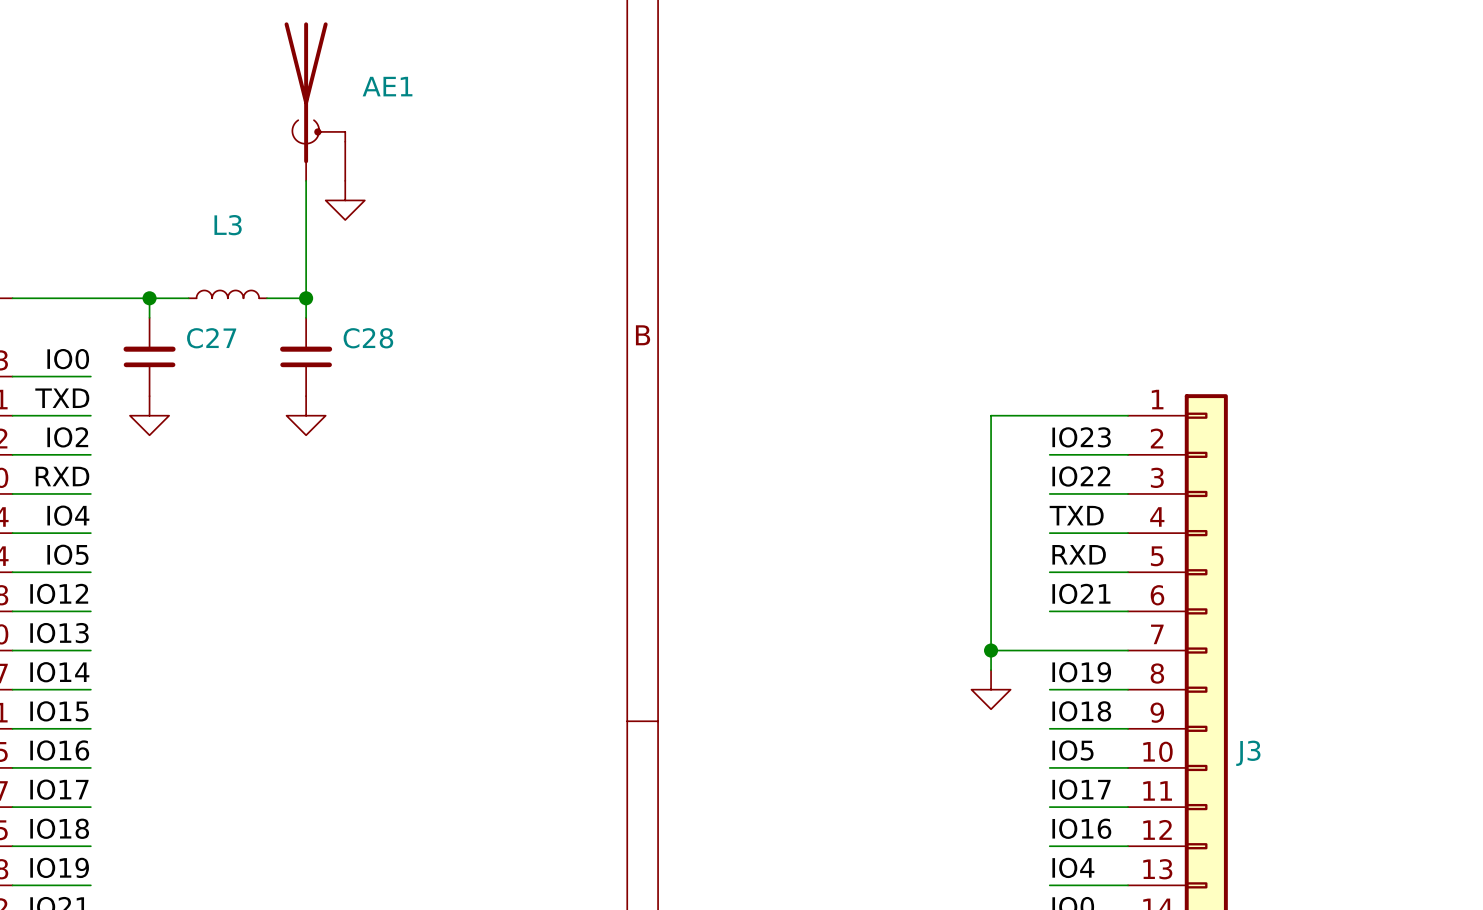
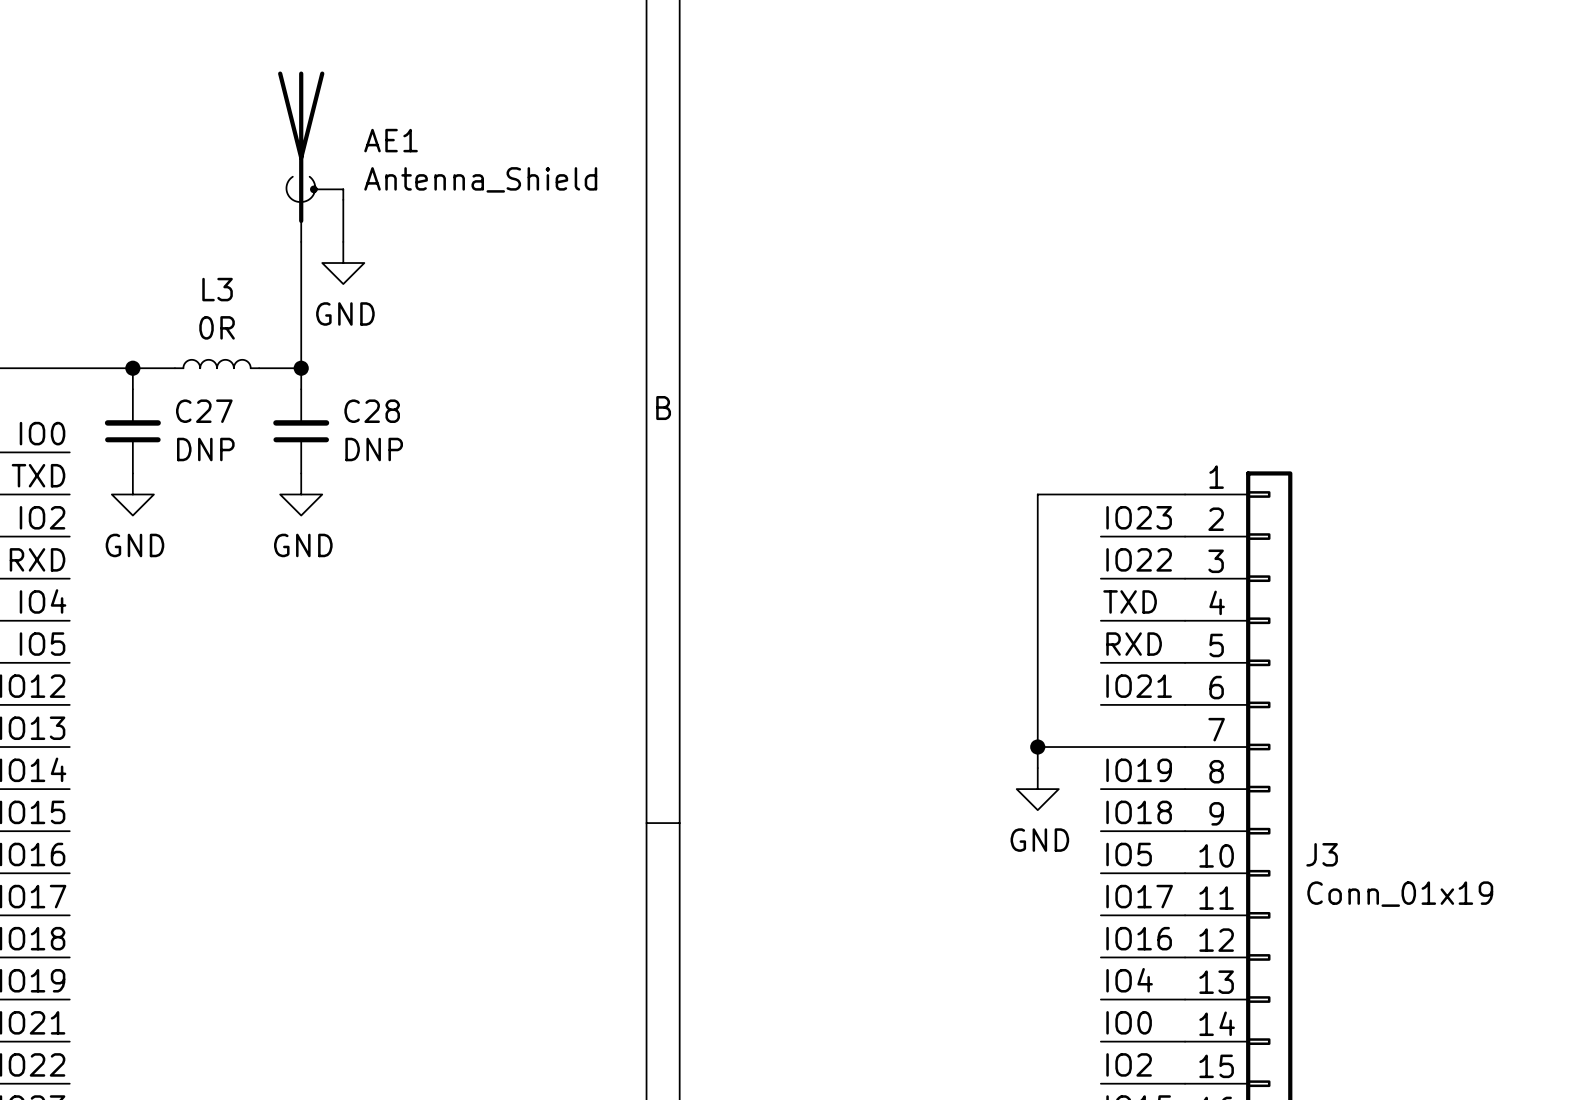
AE1 value: none -> Antenna_Shield (480, 179)
power symbol text: none -> GND (345, 313)
L3 value: none -> 0R (217, 327)
C27 value: none -> DNP (205, 449)
C28 value: none -> DNP (374, 449)
power symbol text: none -> GND (134, 545)
power symbol text: none -> GND (303, 545)
power symbol text: none -> GND (1039, 840)
J3 value: none -> Conn_01x19 (1400, 894)

